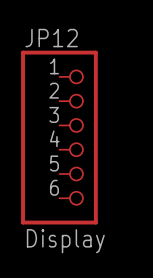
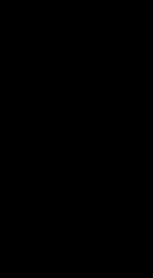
JP12: Display (59, 137) -> none

